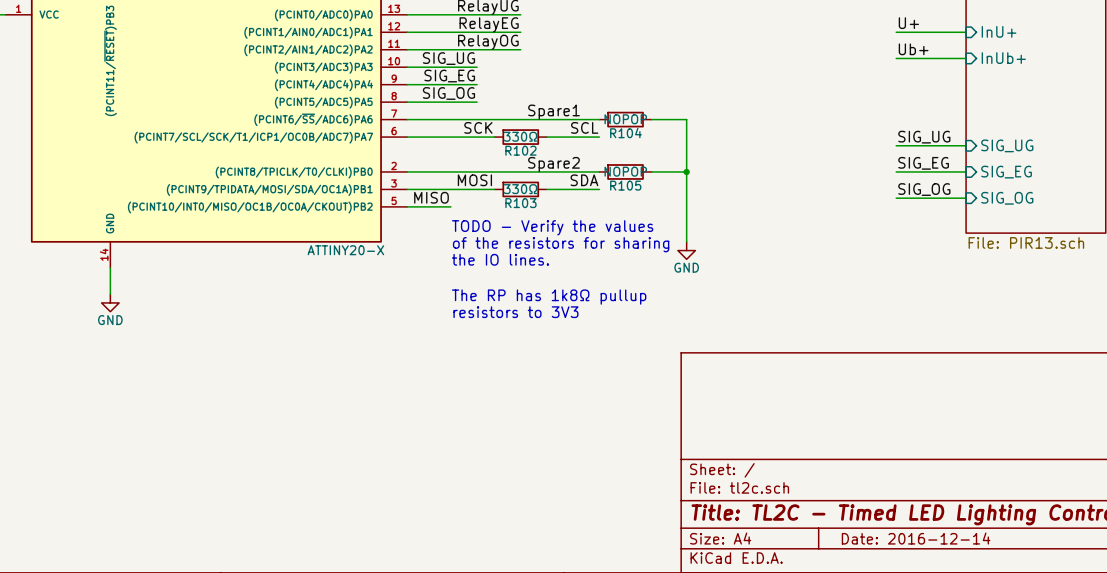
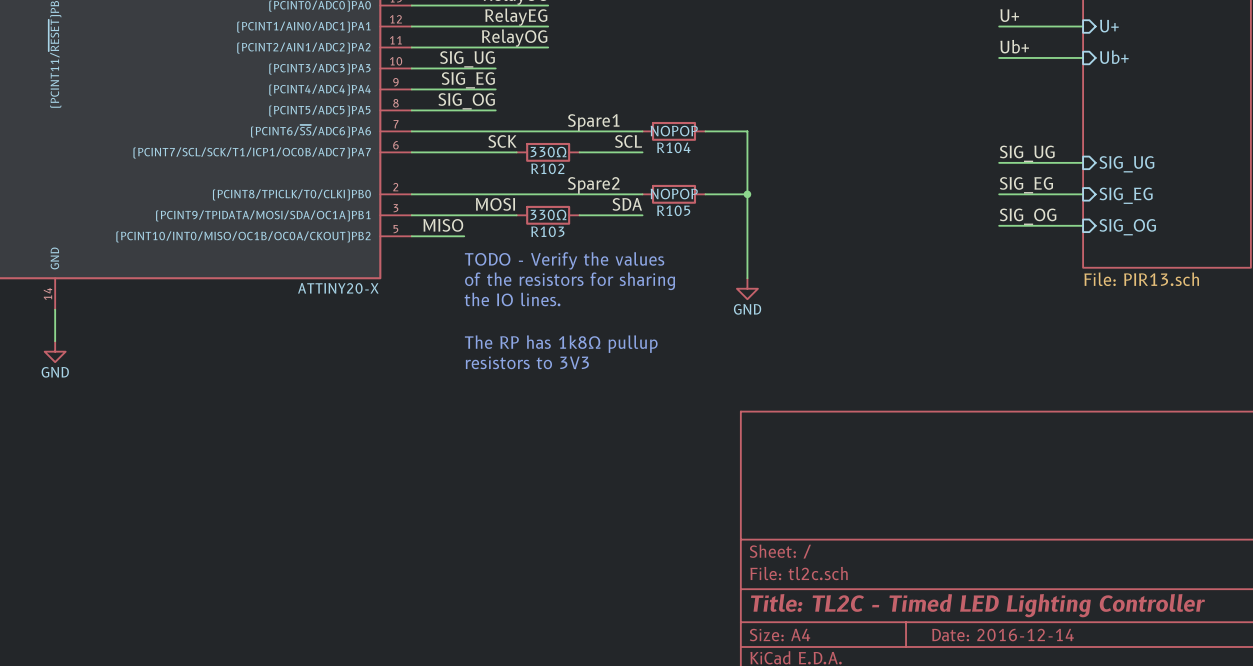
sheet pin: InU+ (999, 31) -> U+ (1109, 26)
sheet pin: InUb+ (1003, 58) -> Ub+ (1114, 57)

